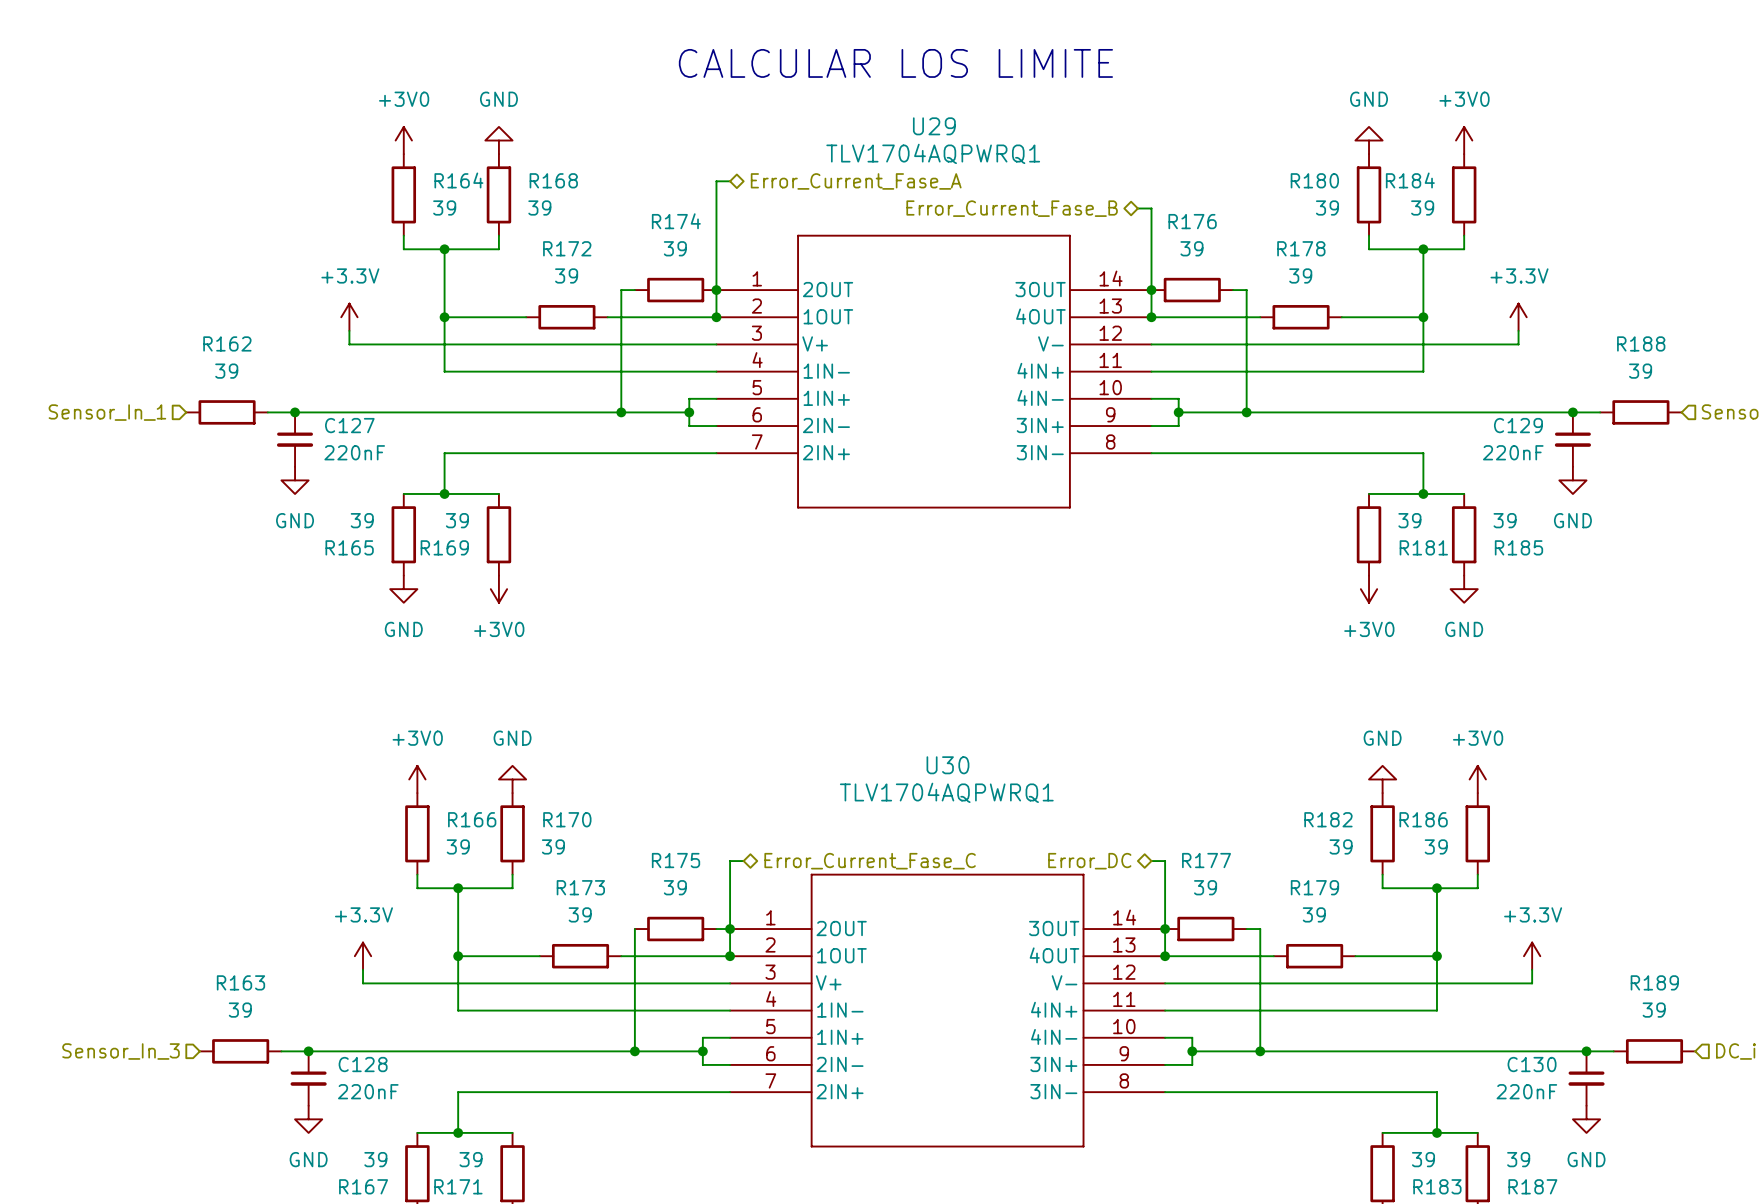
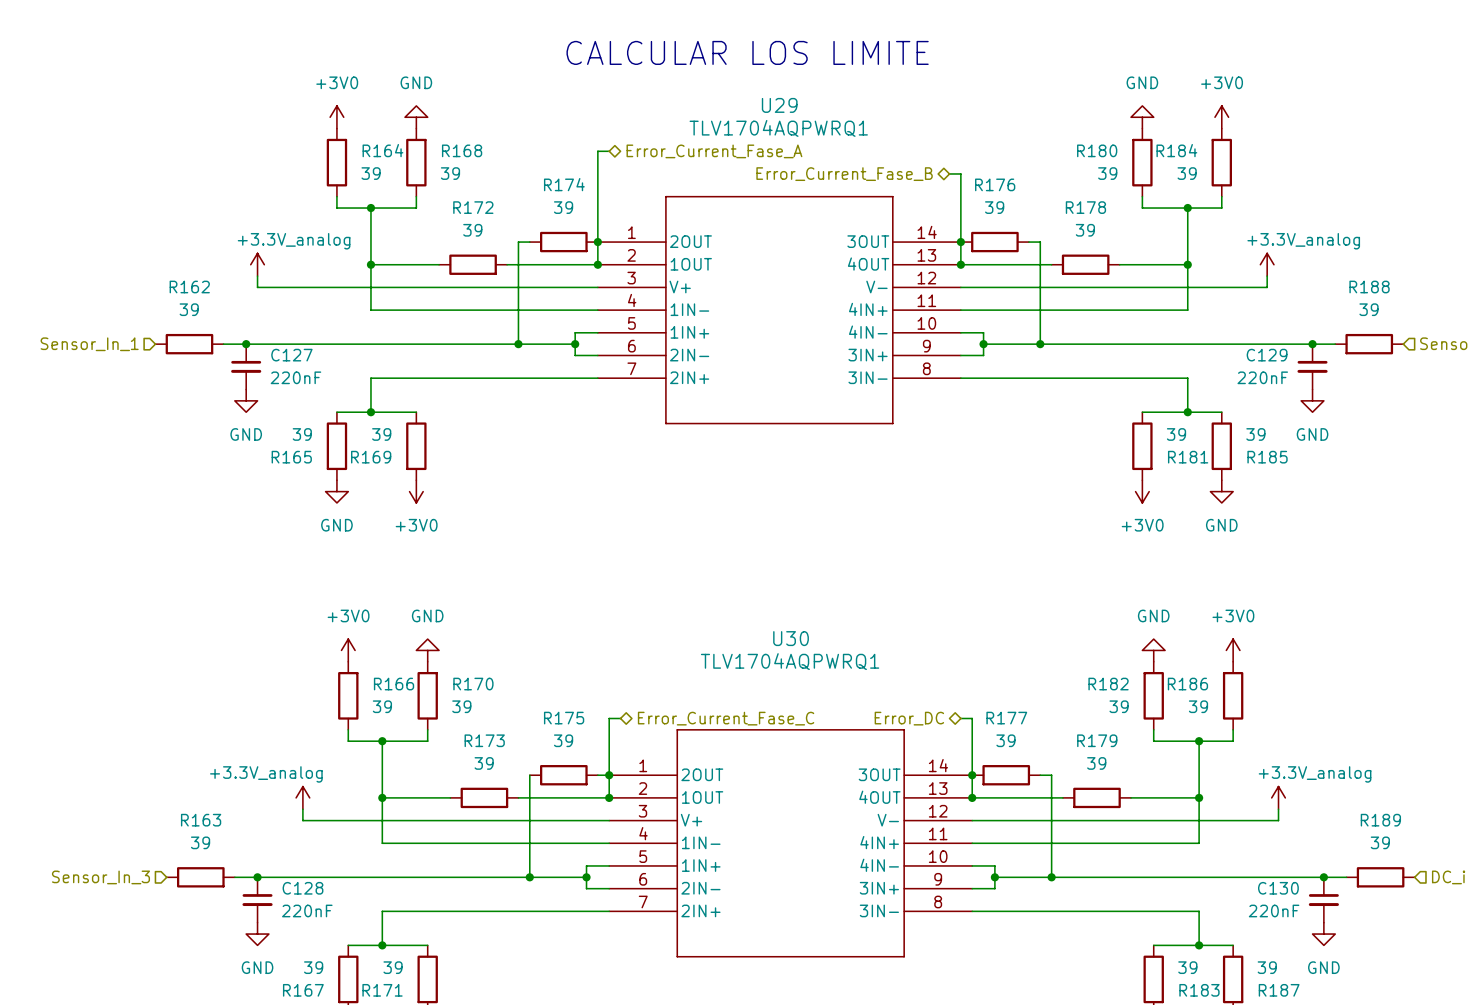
power symbol: none -> +3.3V_analog (257, 264)
power symbol: +3.3V (349, 317) -> none
power symbol: +3.3V (1518, 317) -> +3.3V_analog (1267, 264)
wire: (349, 330) (349, 344) -> (257, 276) (257, 287) (291, 287)
power symbol: +3.3V (363, 956) -> +3.3V_analog (302, 797)
power symbol: +3.3V (1532, 956) -> +3.3V_analog (1278, 797)

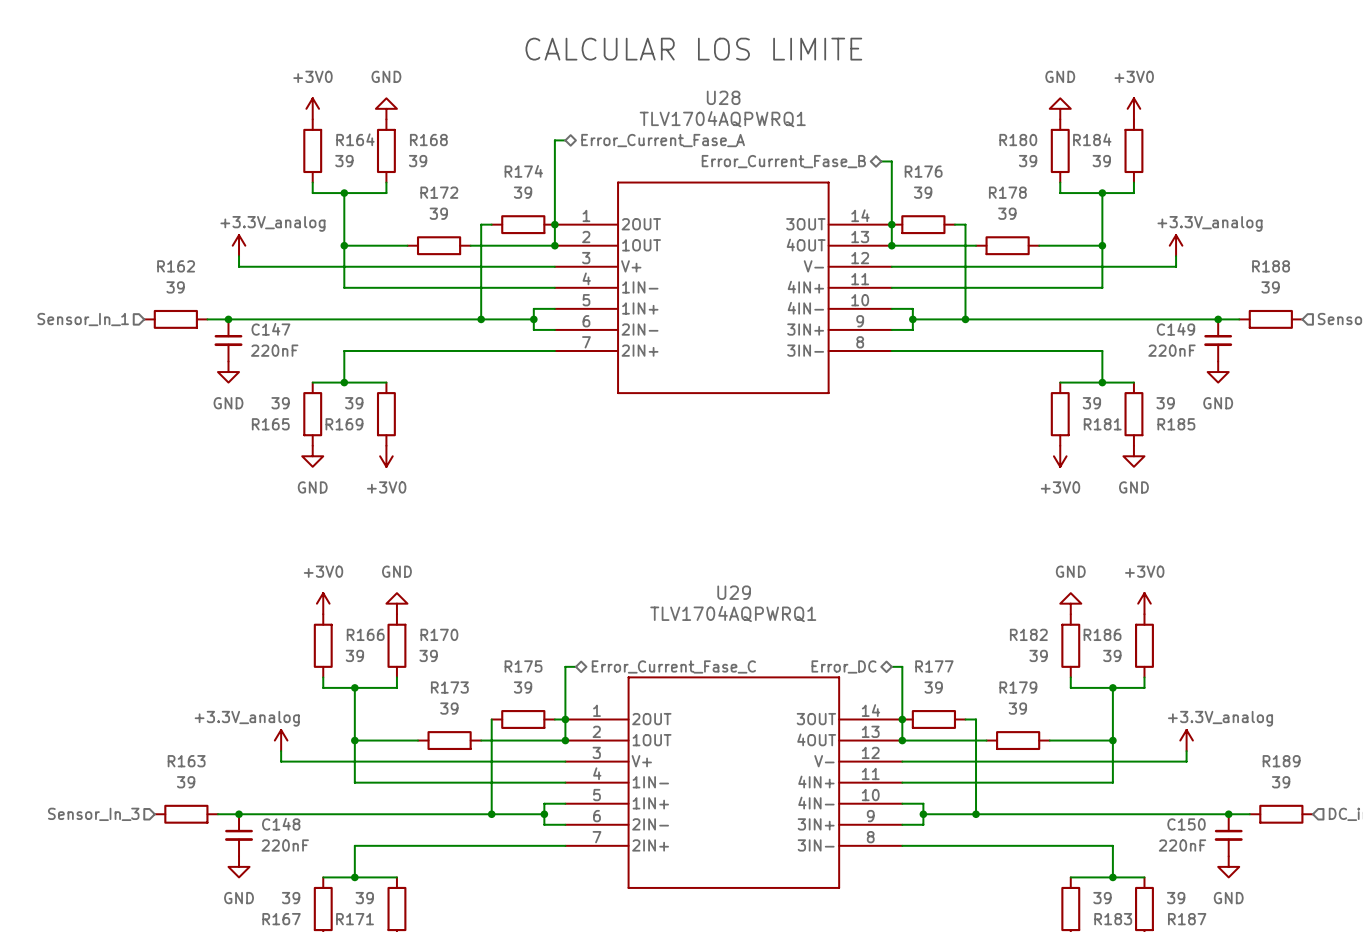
U29 name: U29 (779, 105) -> U28 (723, 97)
C127 name: C127 (291, 355) -> C147 (270, 329)
C129 name: C129 (1267, 355) -> C149 (1175, 329)
U30 name: U30 (791, 638) -> U29 (734, 592)
C128 name: C128 (303, 888) -> C148 (281, 824)
C130 name: C130 (1278, 888) -> C150 (1186, 824)

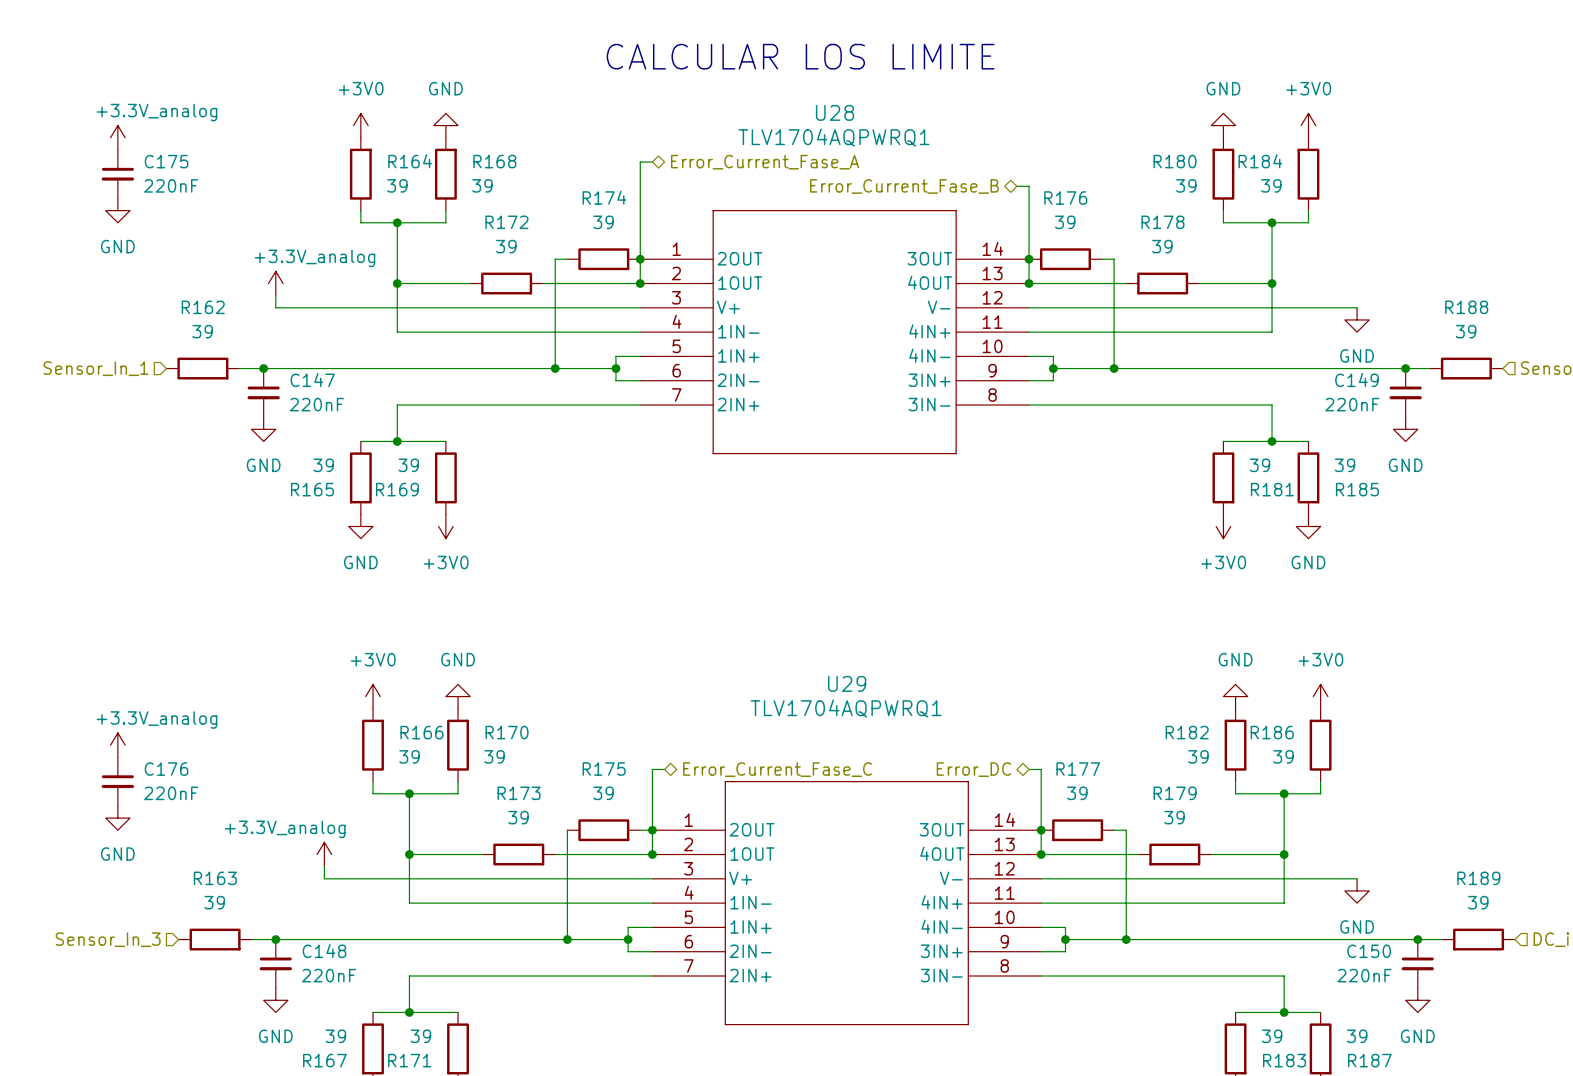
power symbol: none -> +3.3V_analog (117, 137)
C175: none -> 220nF (117, 174)
power symbol: none -> GND (117, 210)
power symbol: +3.3V_analog (1176, 245) -> none
wire: (1176, 256) (1176, 266) -> none
power symbol: none -> GND (1357, 319)
power symbol: none -> +3.3V_analog (117, 745)
C176: none -> 220nF (117, 781)
power symbol: none -> GND (117, 818)
power symbol: +3.3V_analog (1186, 740) -> none
wire: (1186, 751) (1186, 761) (1176, 761) -> none
power symbol: none -> GND (1357, 890)

